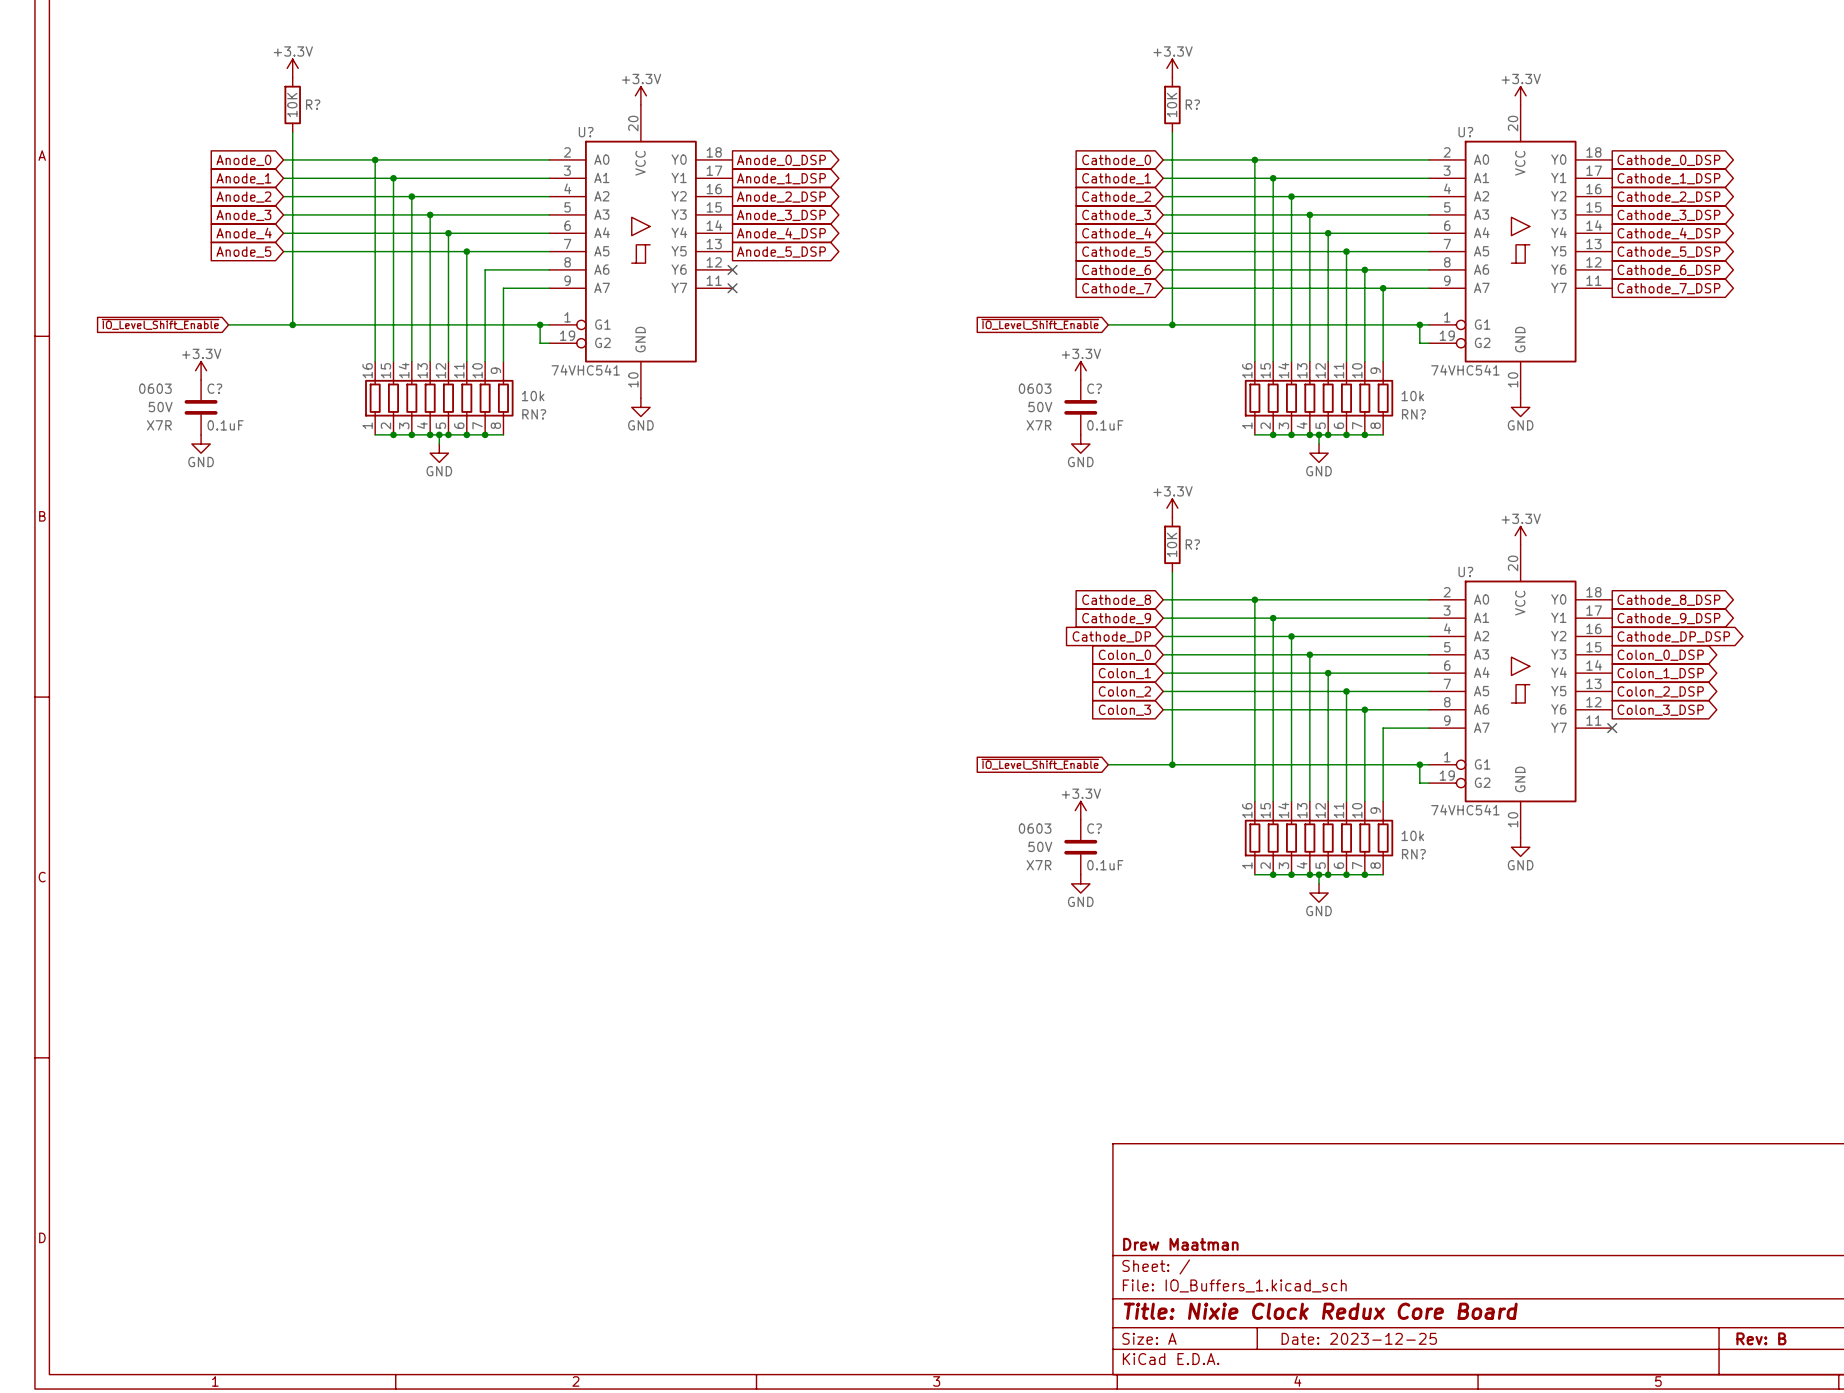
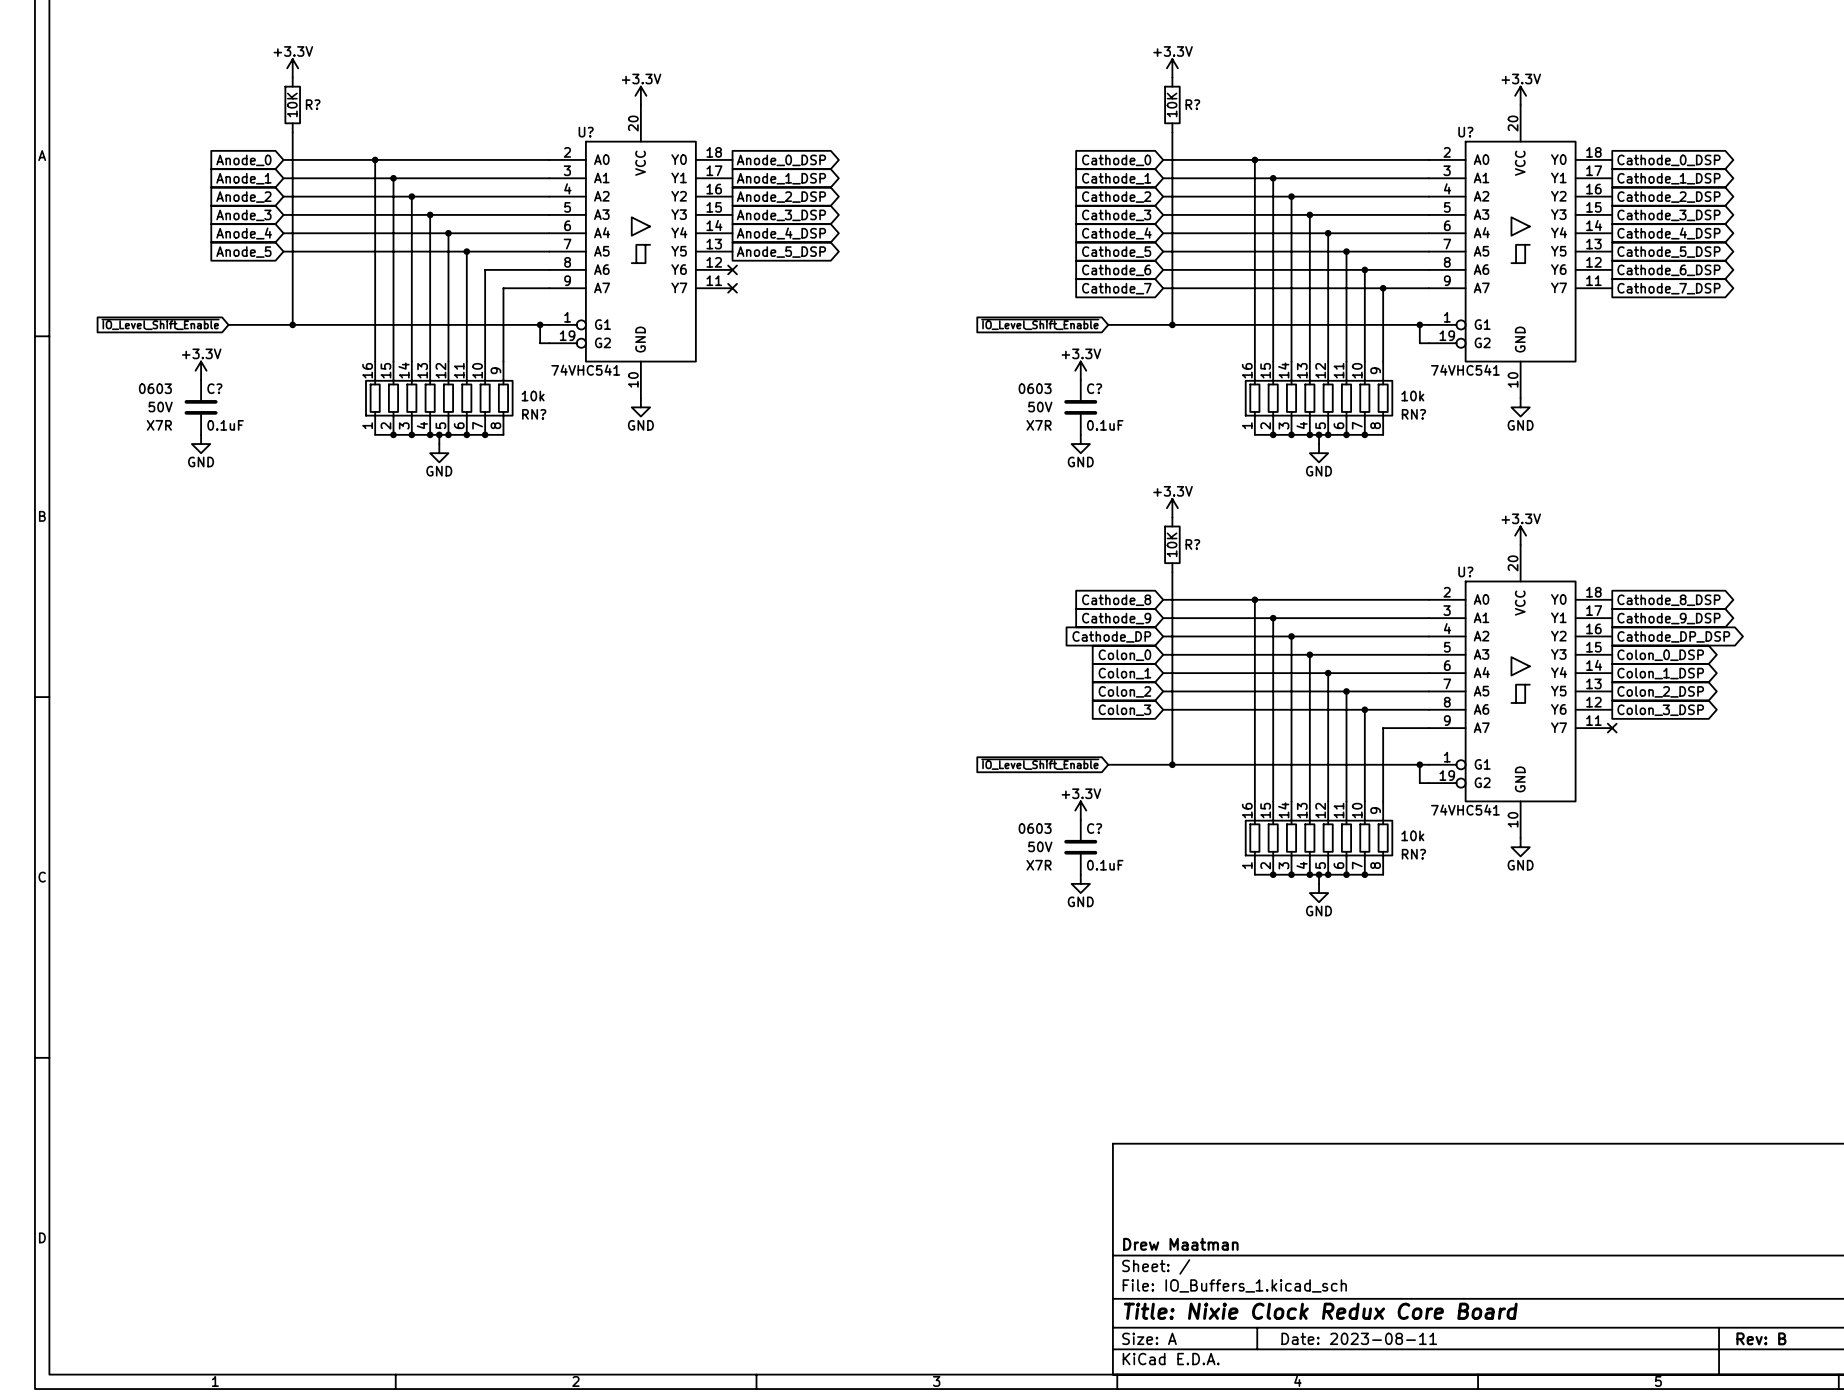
title block: Date: 2023-12-25 (1359, 1338) -> Date: 2023-08-11 (1359, 1338)

